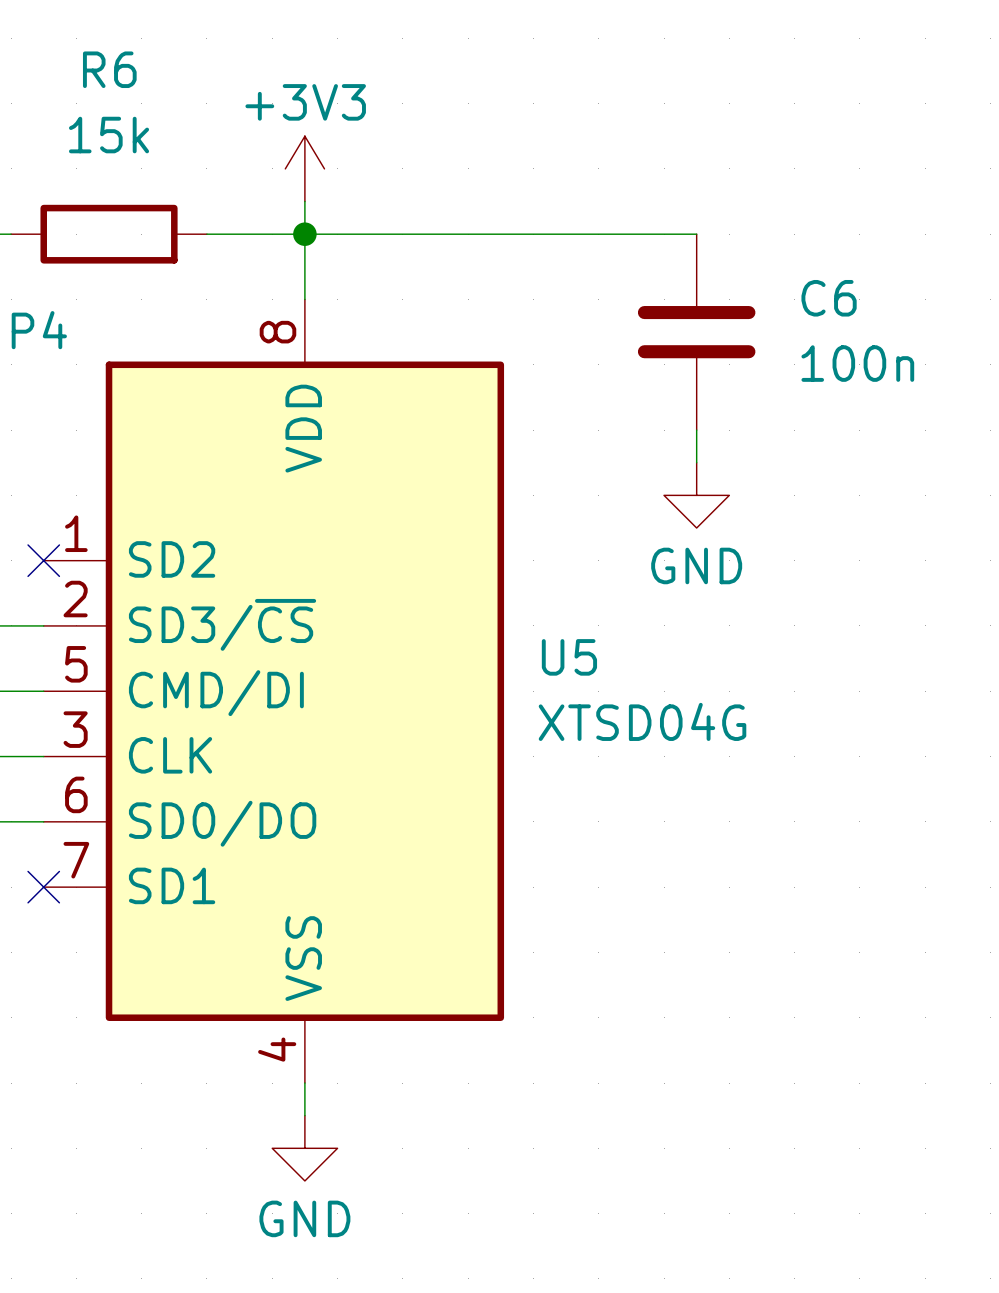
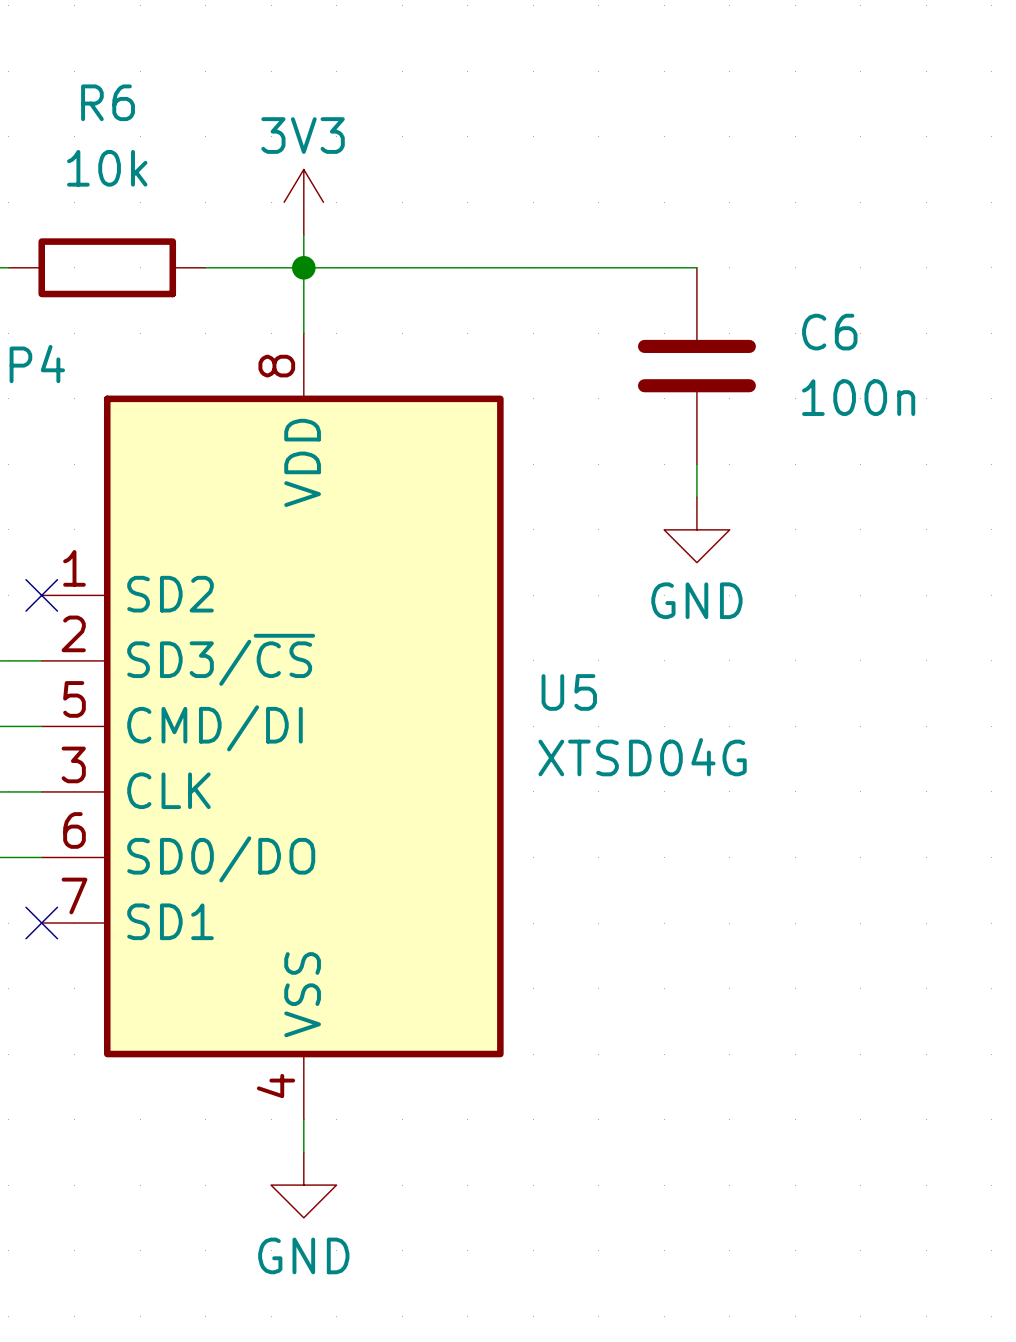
R6 value: 15k (109, 135) -> 10k (107, 168)
power symbol: +3V3 (304, 168) -> 3V3 (303, 202)

